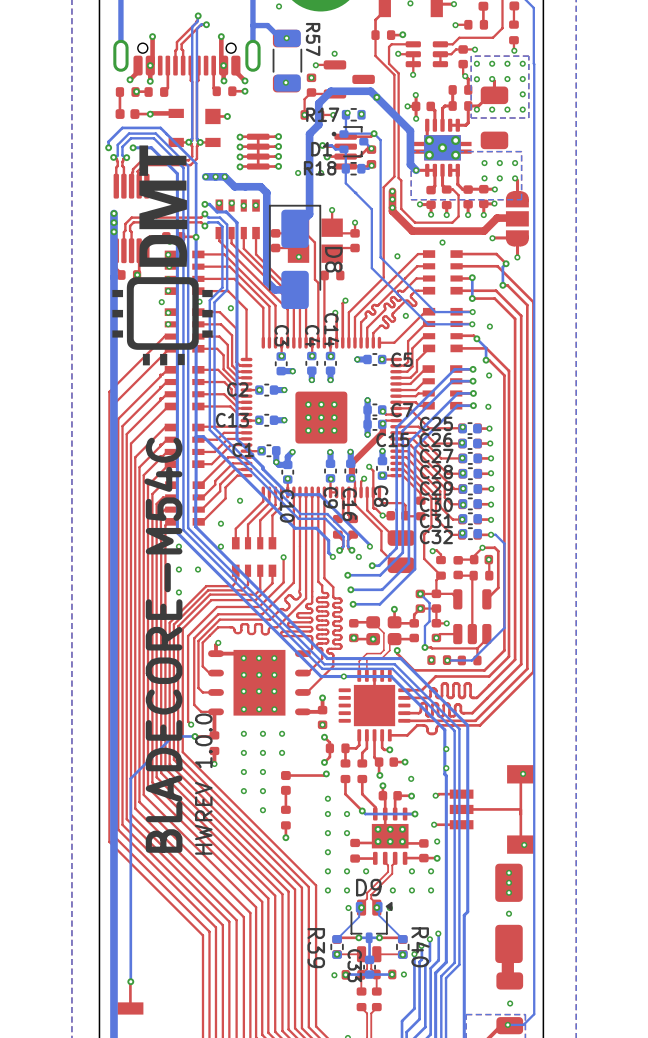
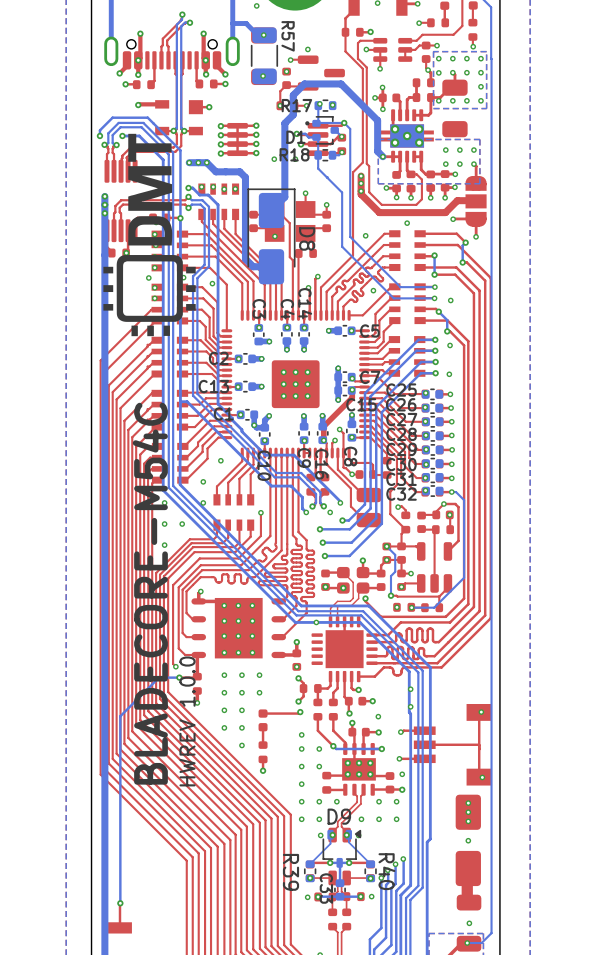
top track: (119, 92) (119, 113) -> none
part: (127, 92) -> none
via: (376, 97) -> none
part: (127, 114) -> none
top track: (150, 114) (134, 114) -> none

